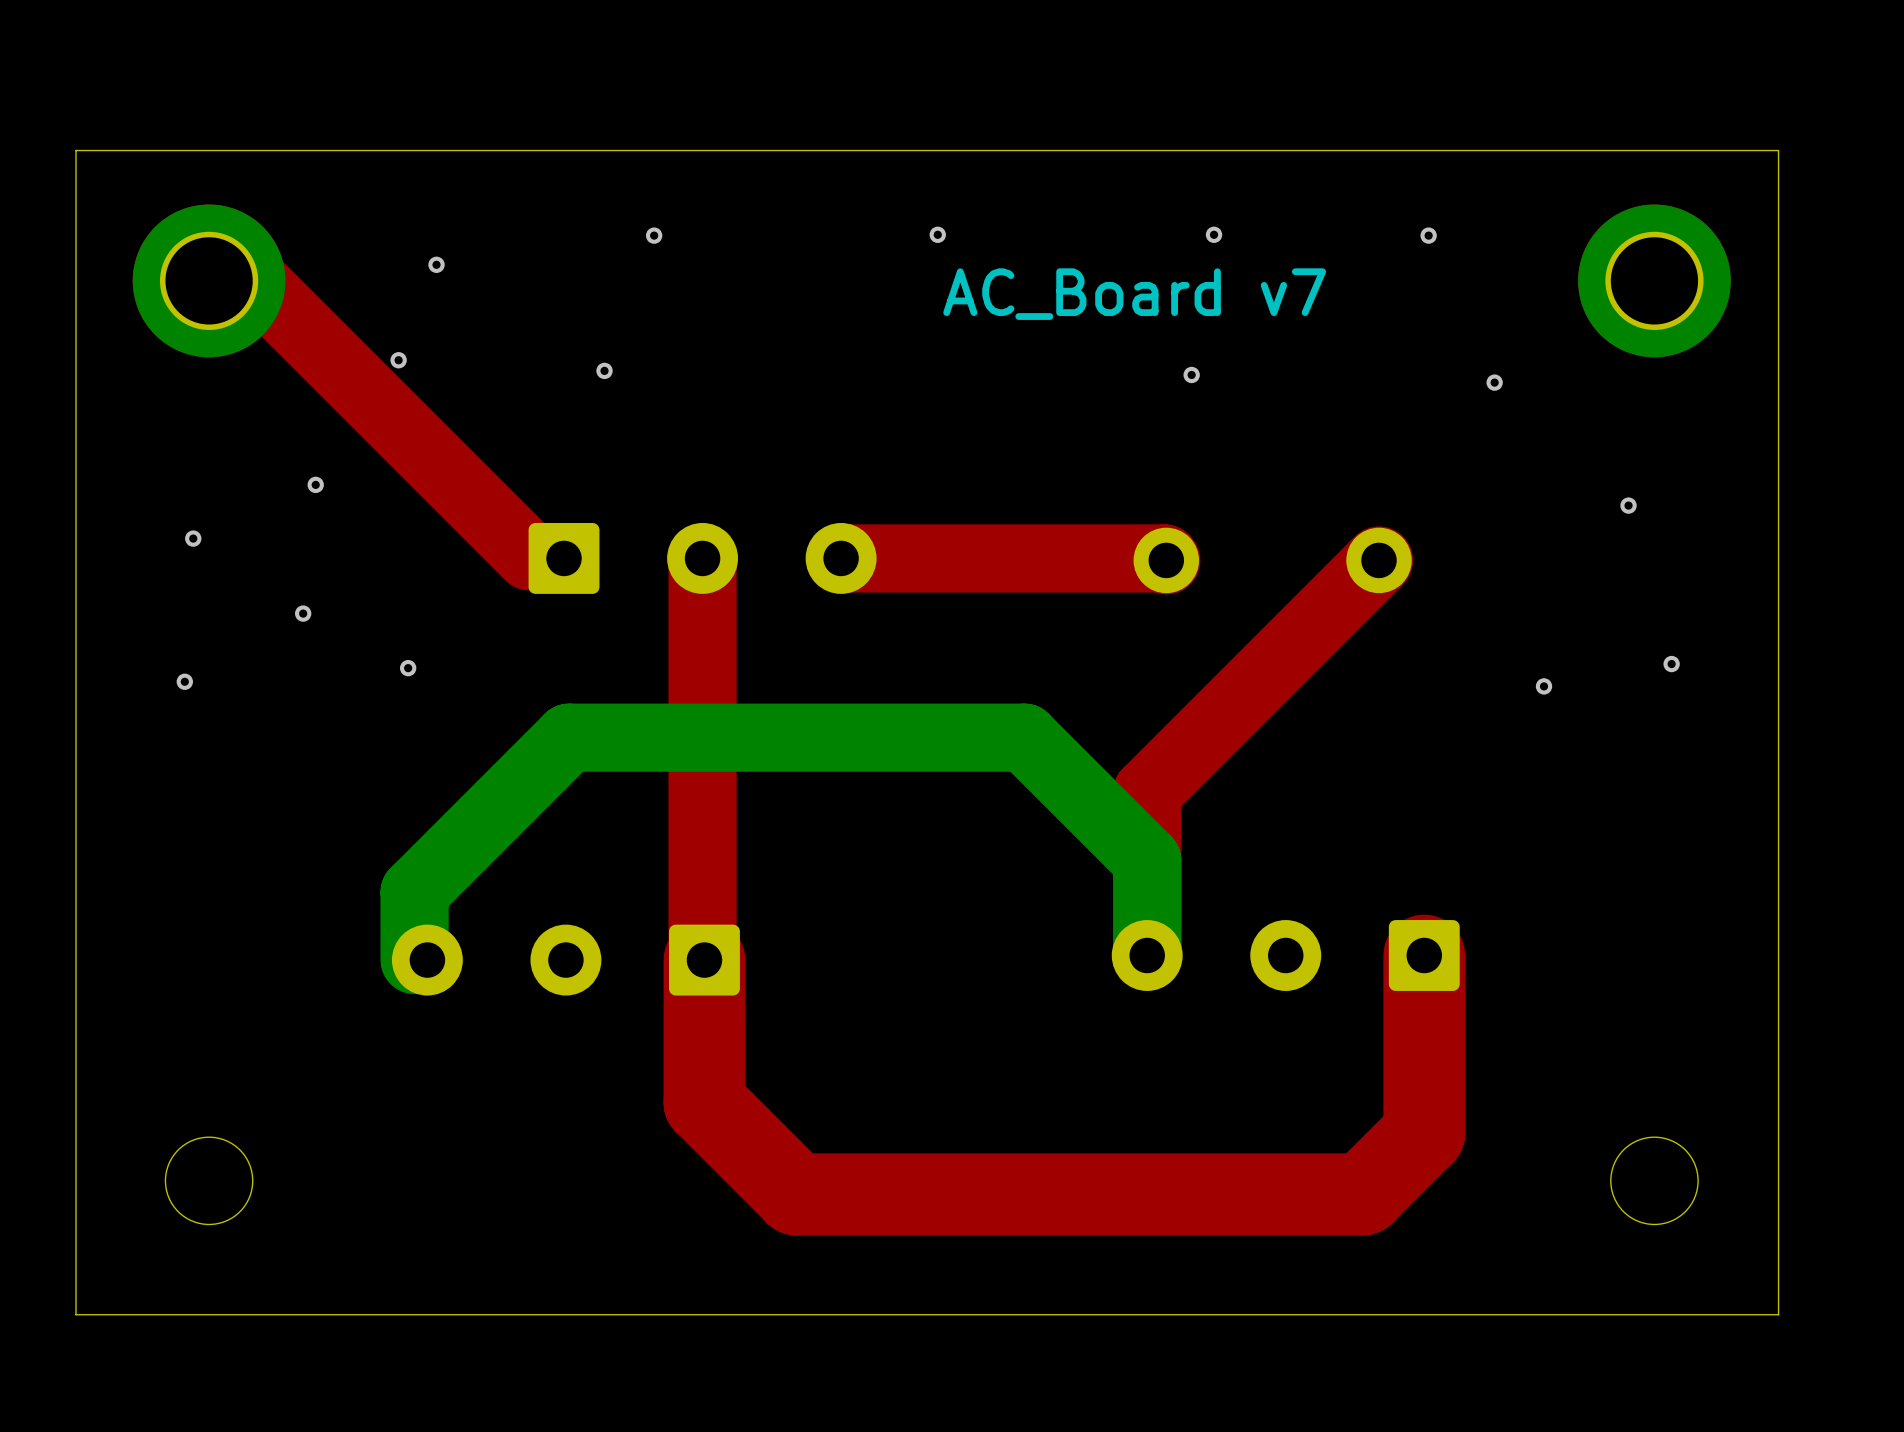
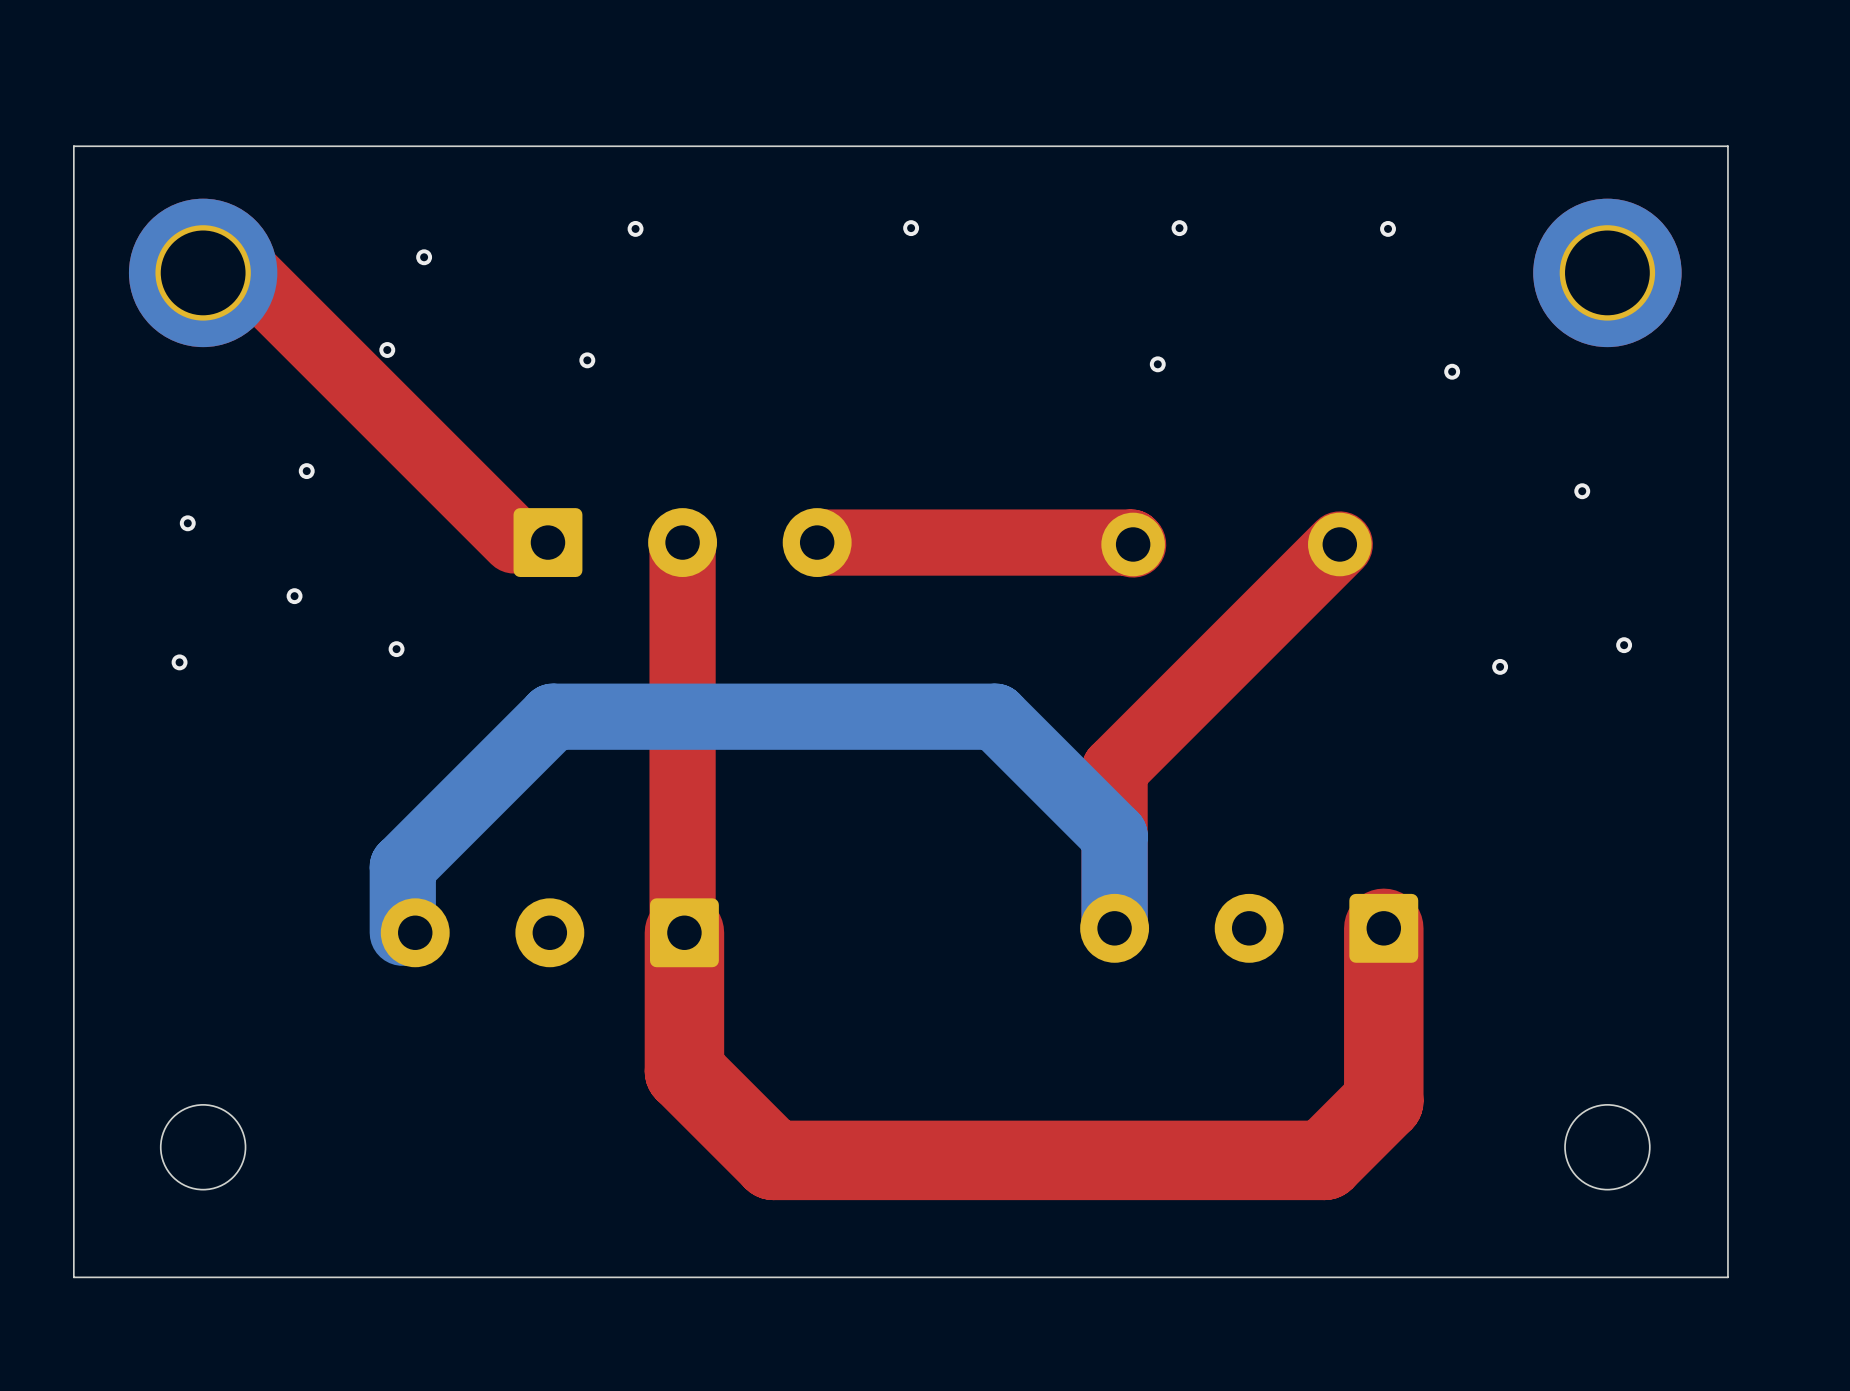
text: AC_Board v7 (1134, 294) -> none

